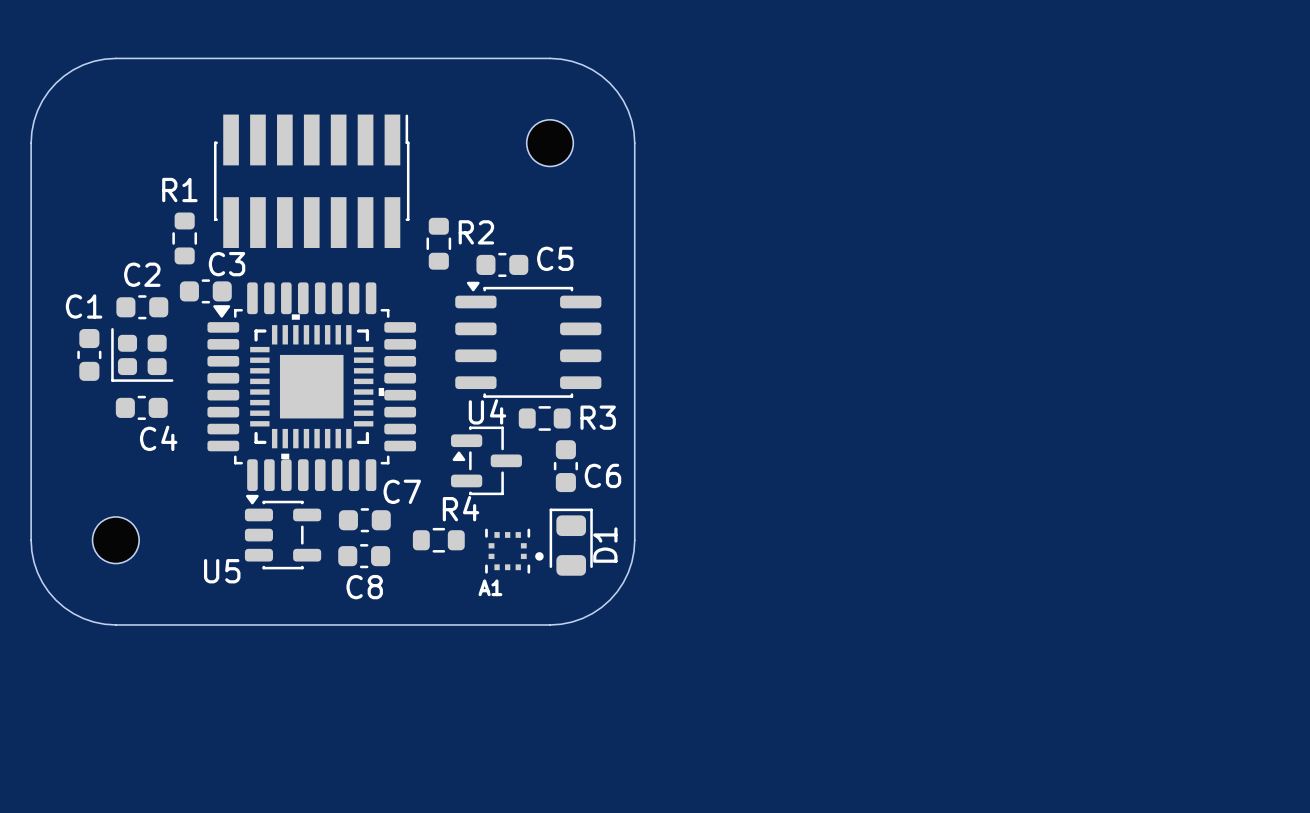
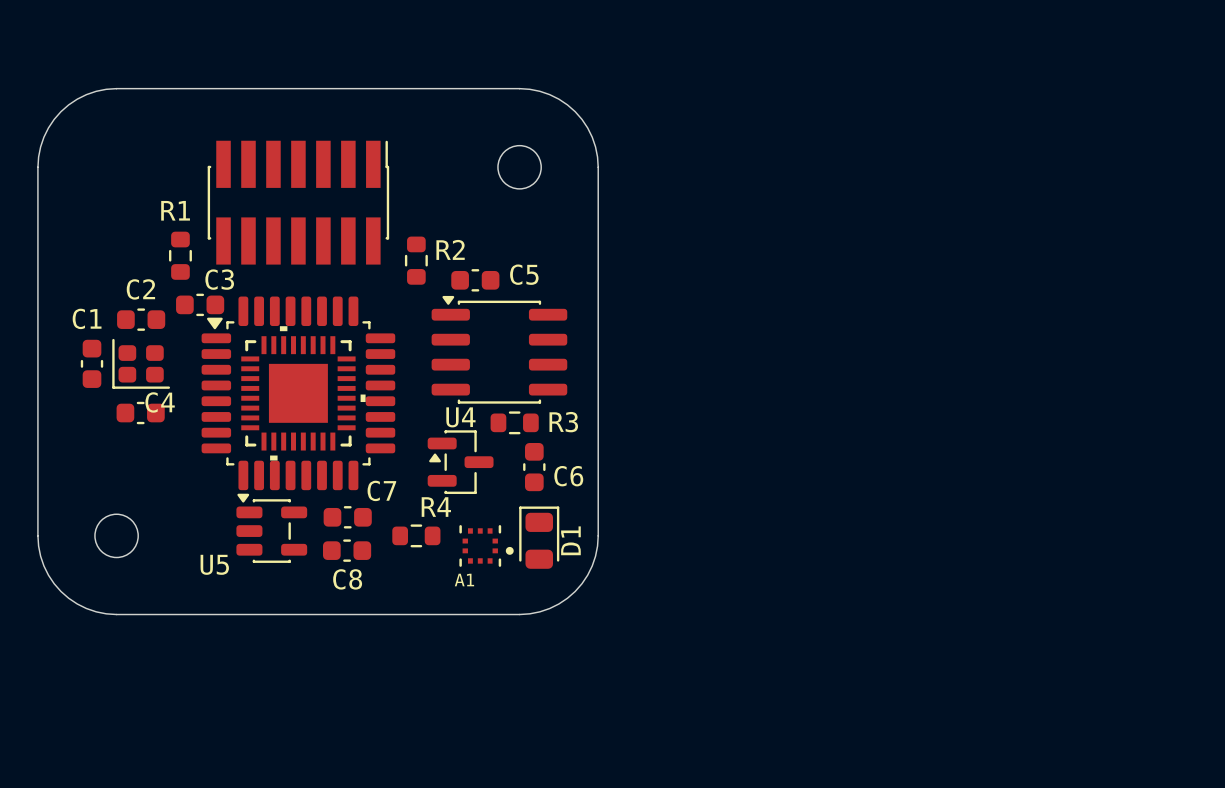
C4 name position: C4 (158, 438) -> C4 (160, 402)

